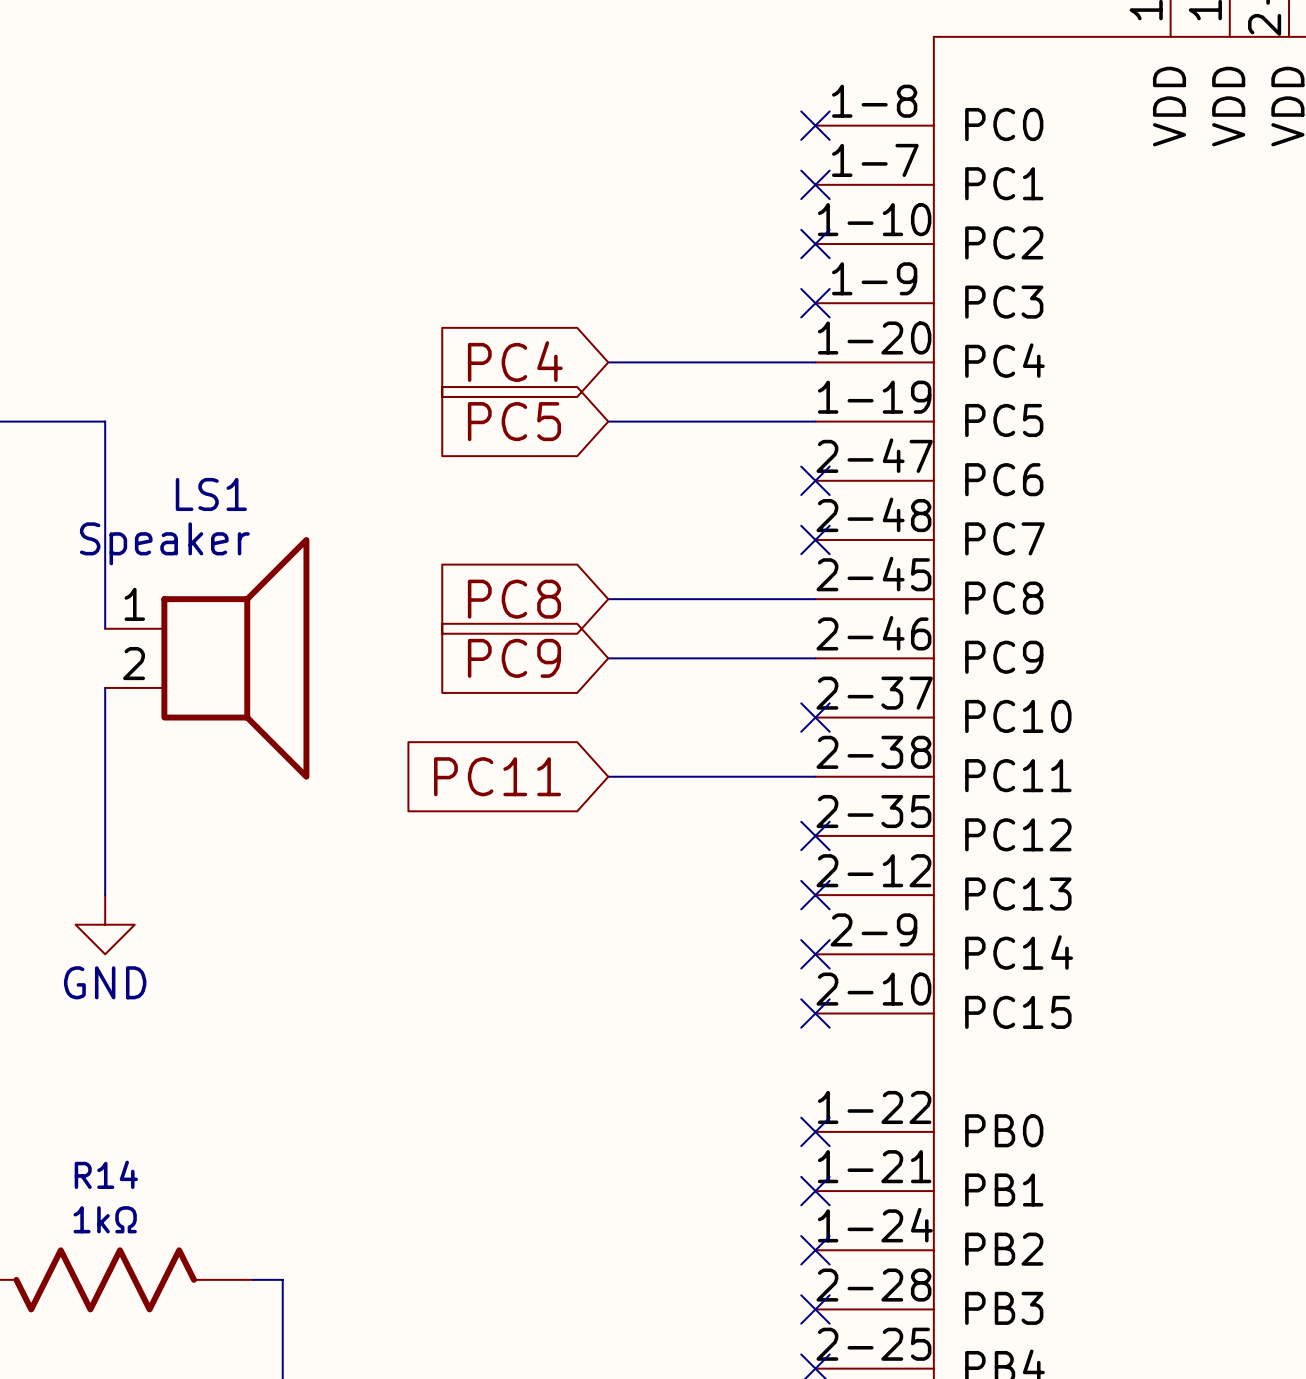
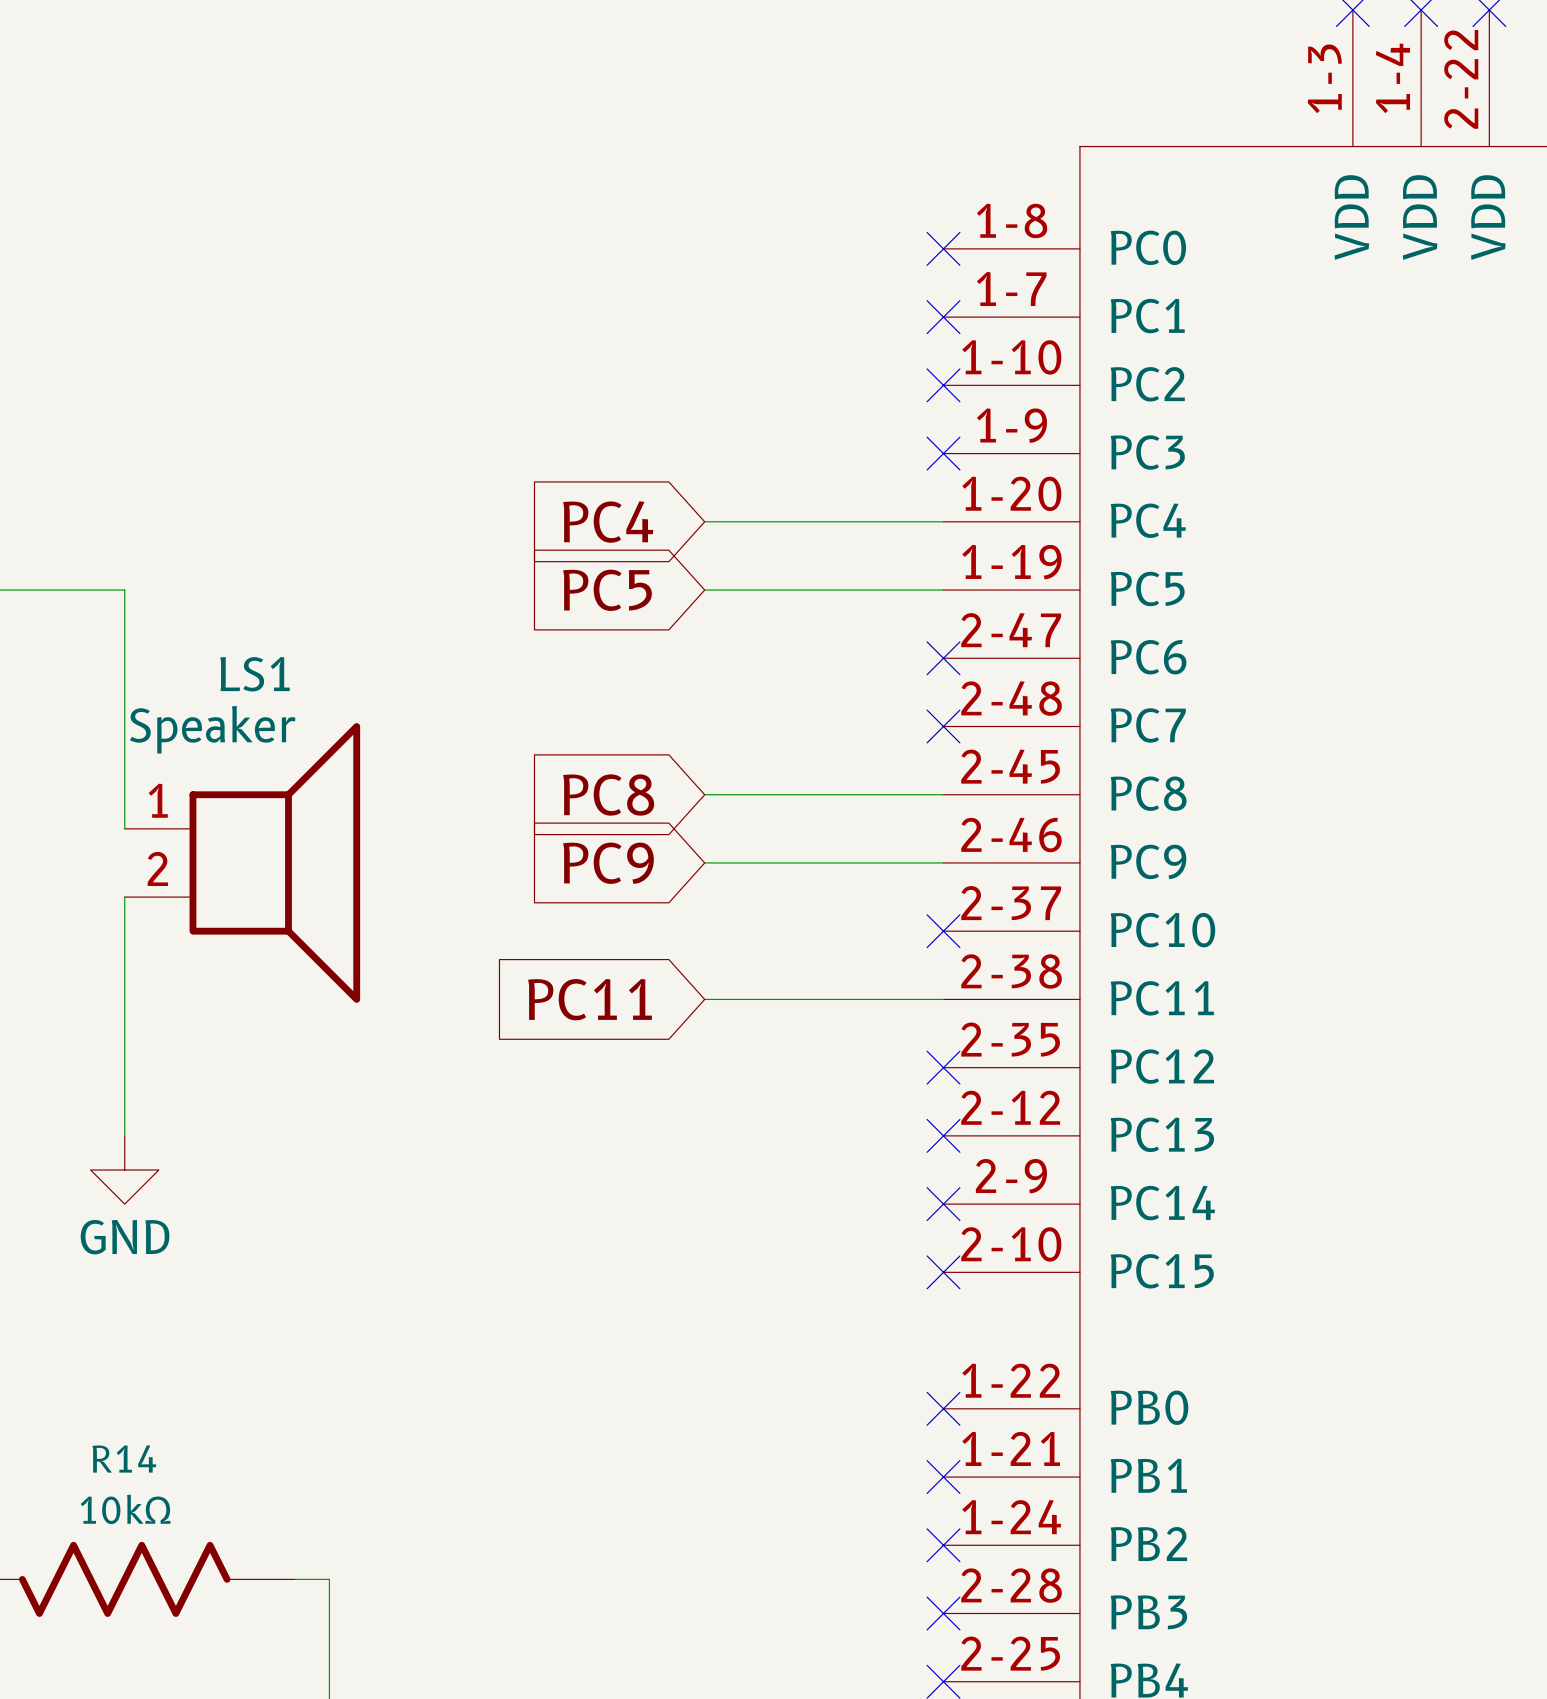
R14 value: 1kΩ (105, 1219) -> 10kΩ (125, 1509)

